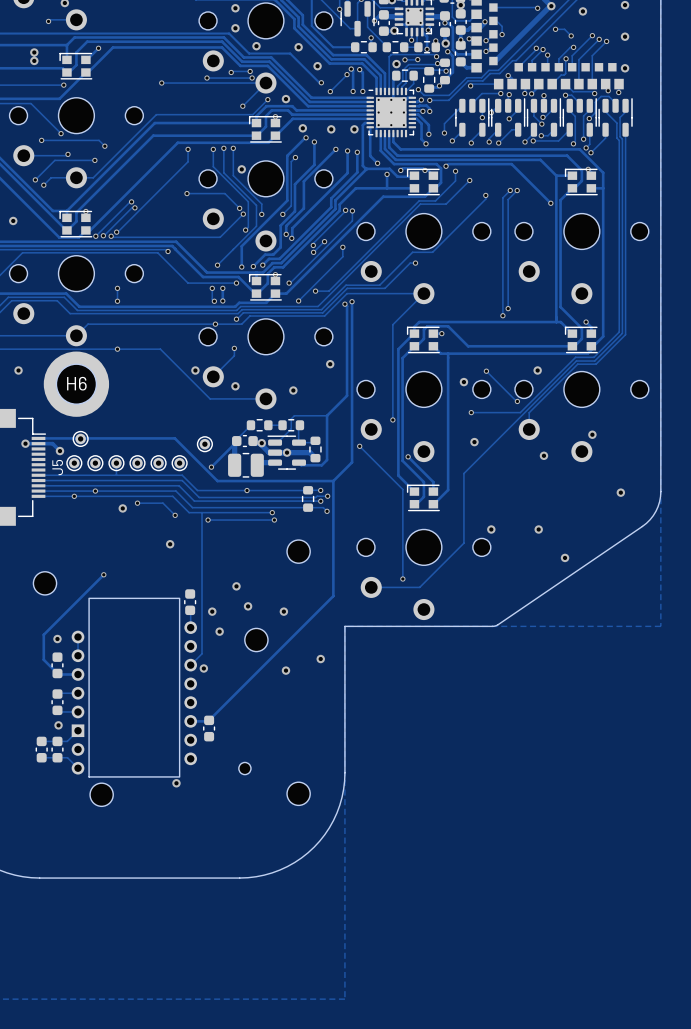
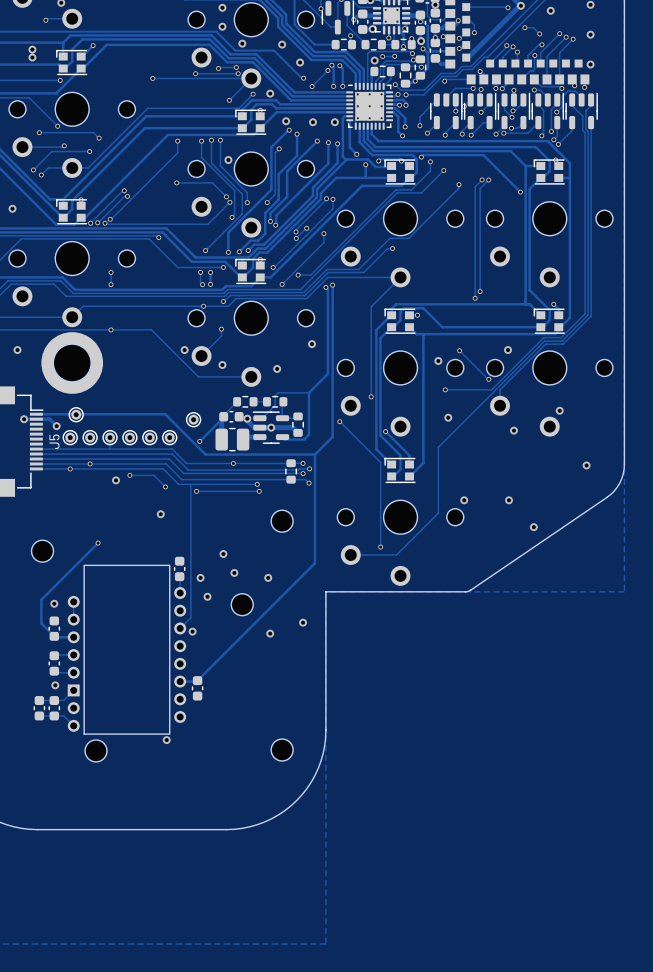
H6 name: H6 (76, 383) -> none
part: (244, 768) -> none

